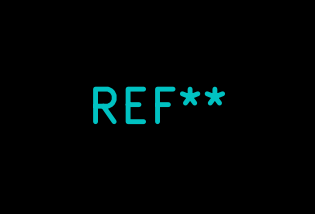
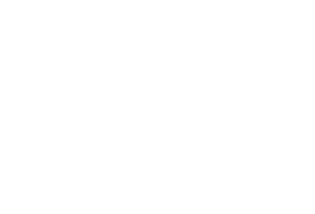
REF**: (159, 105) -> none

